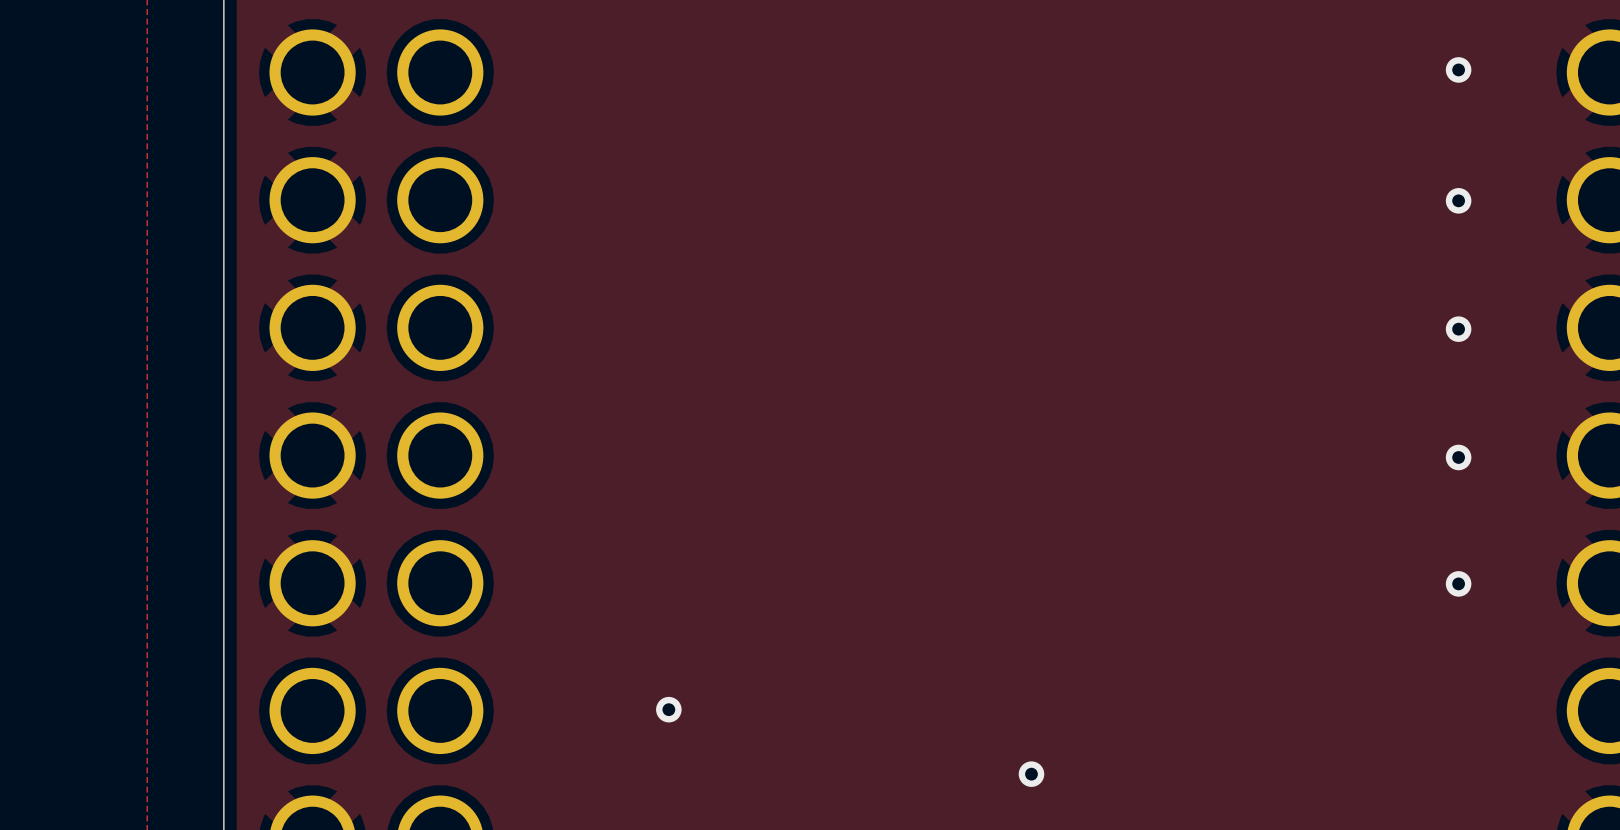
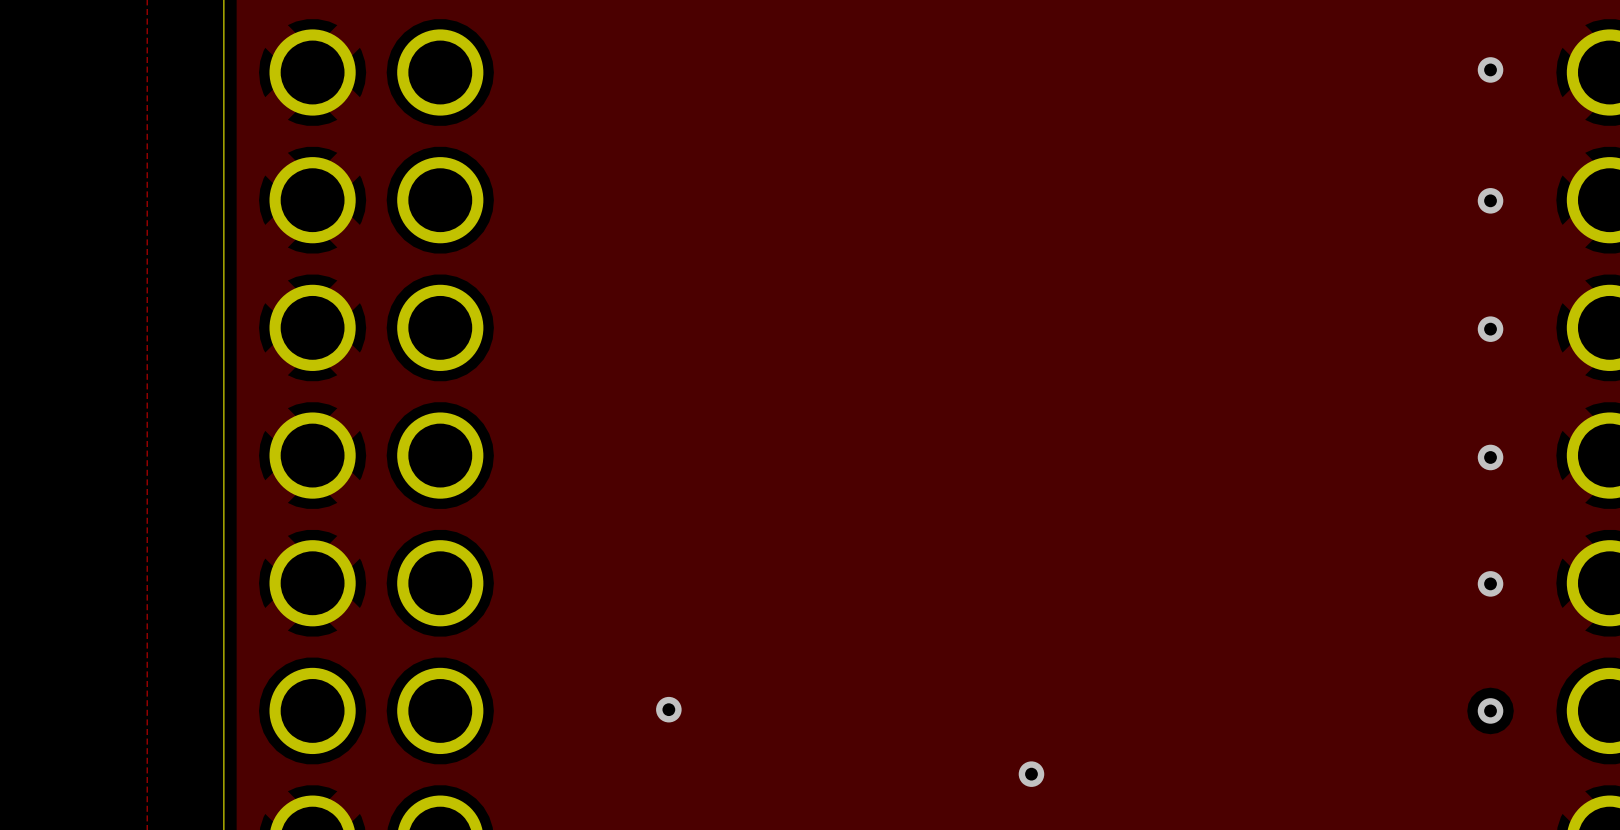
via position: (1458, 69) -> (1490, 69)
via position: (1458, 200) -> (1490, 200)
via position: (1458, 329) -> (1490, 329)
via position: (1458, 457) -> (1490, 457)
via position: (1458, 583) -> (1490, 583)
via: none -> (1490, 710)

